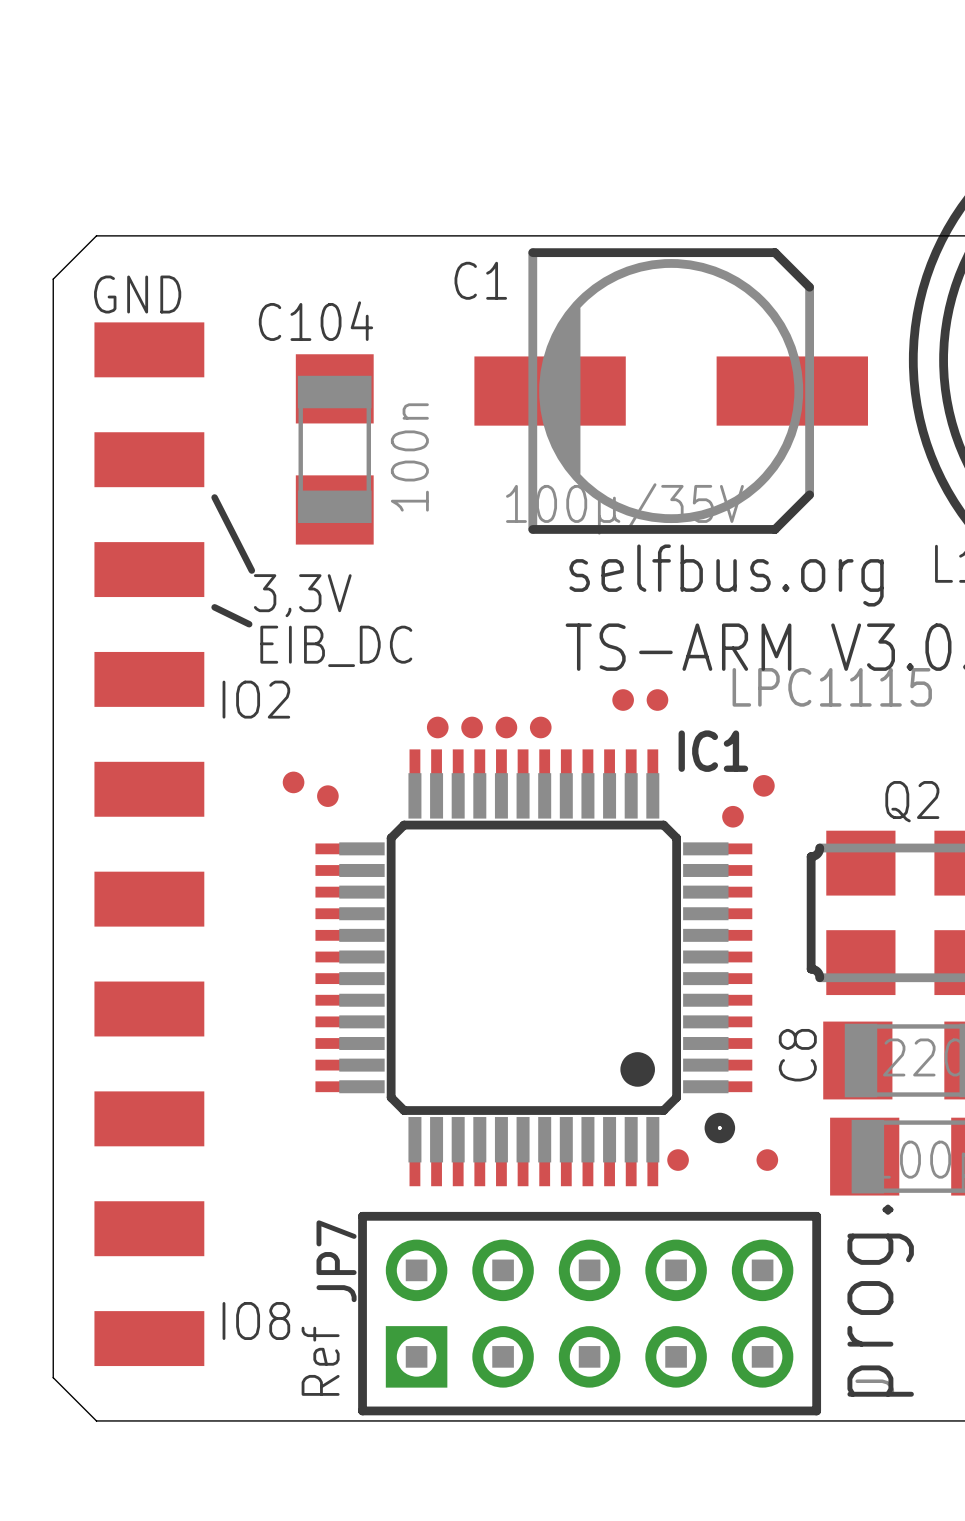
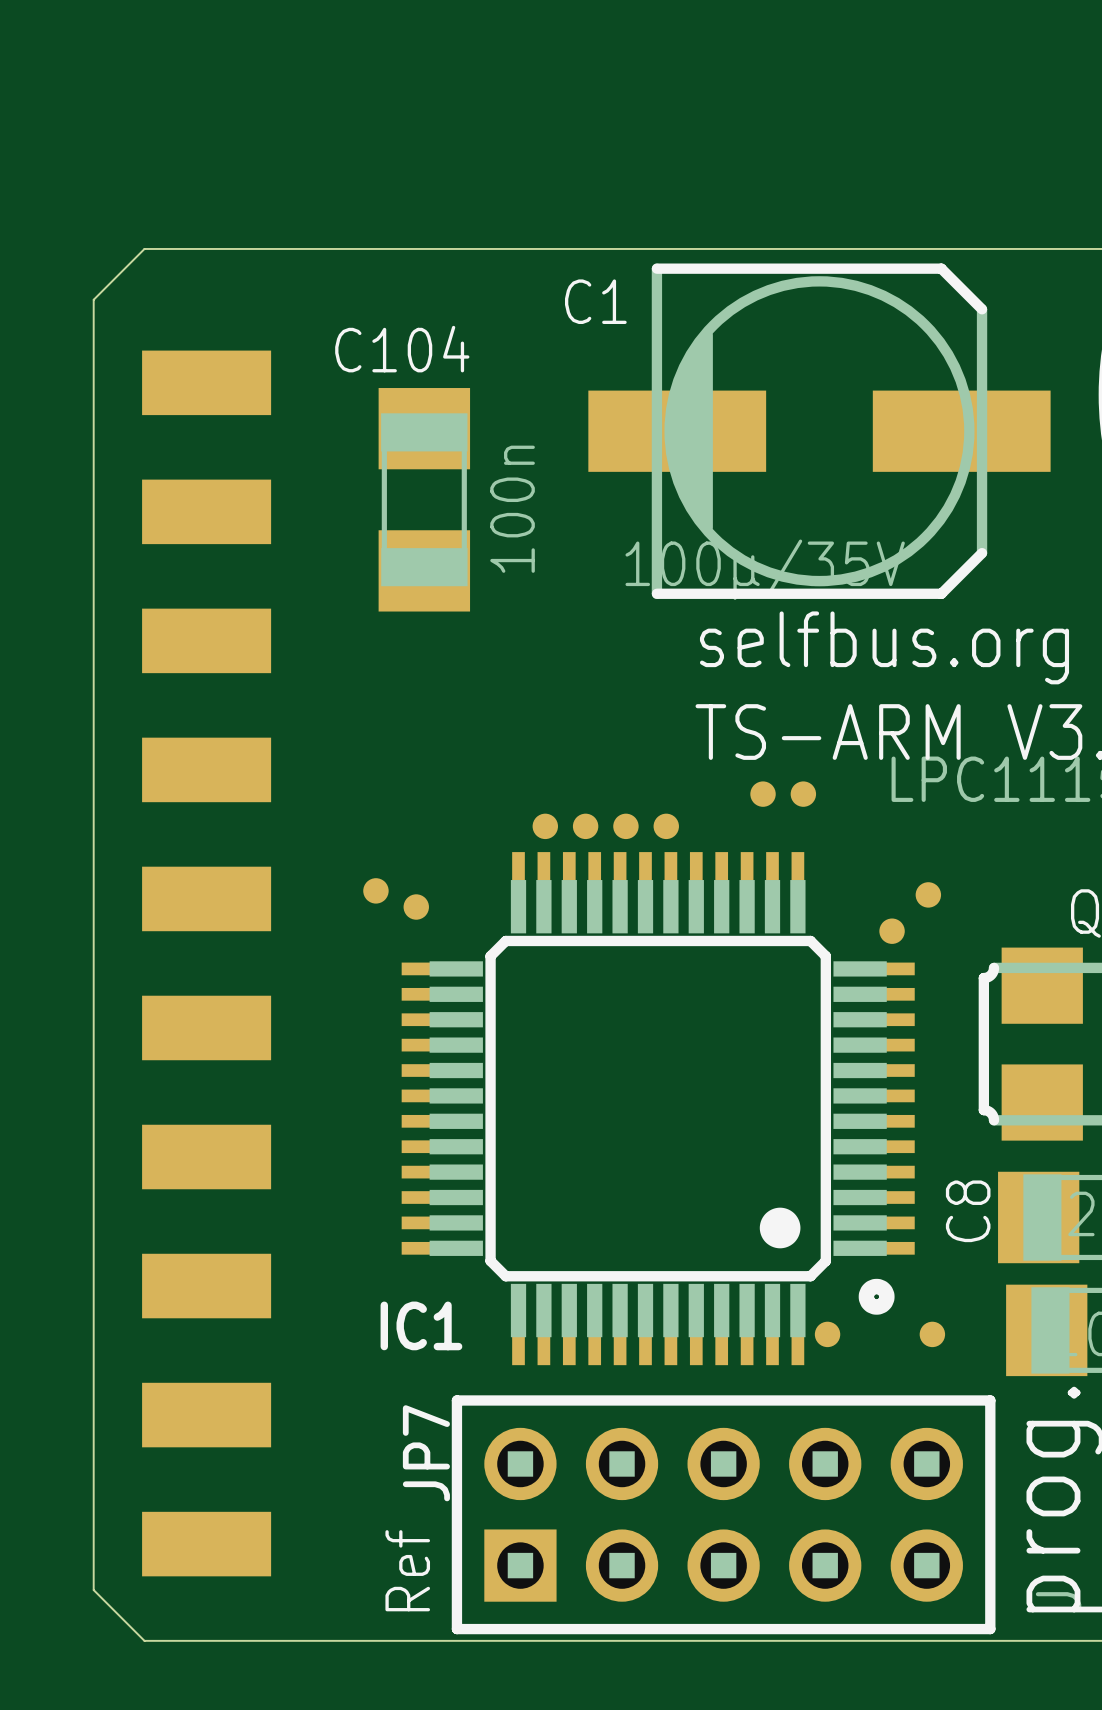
text: GND (137, 294) -> none
line: (214, 497) (251, 570) -> none
text: 3,3V (302, 595) -> none
line: (214, 607) (249, 624) -> none
text: EIB_DC (336, 646) -> none
text: IO2 (256, 699) -> none
IC1 name position: IC1 (713, 751) -> IC1 (421, 1325)
text: IO8 (256, 1320) -> none

